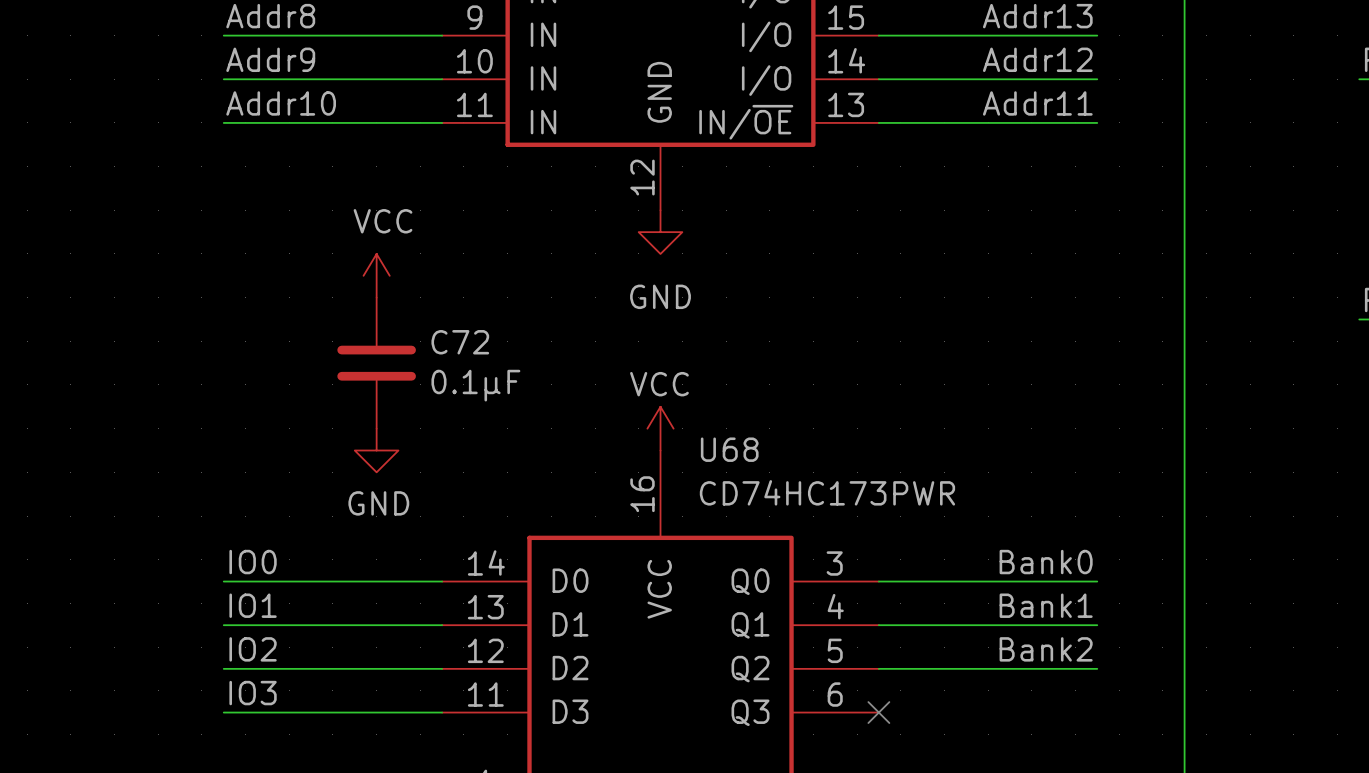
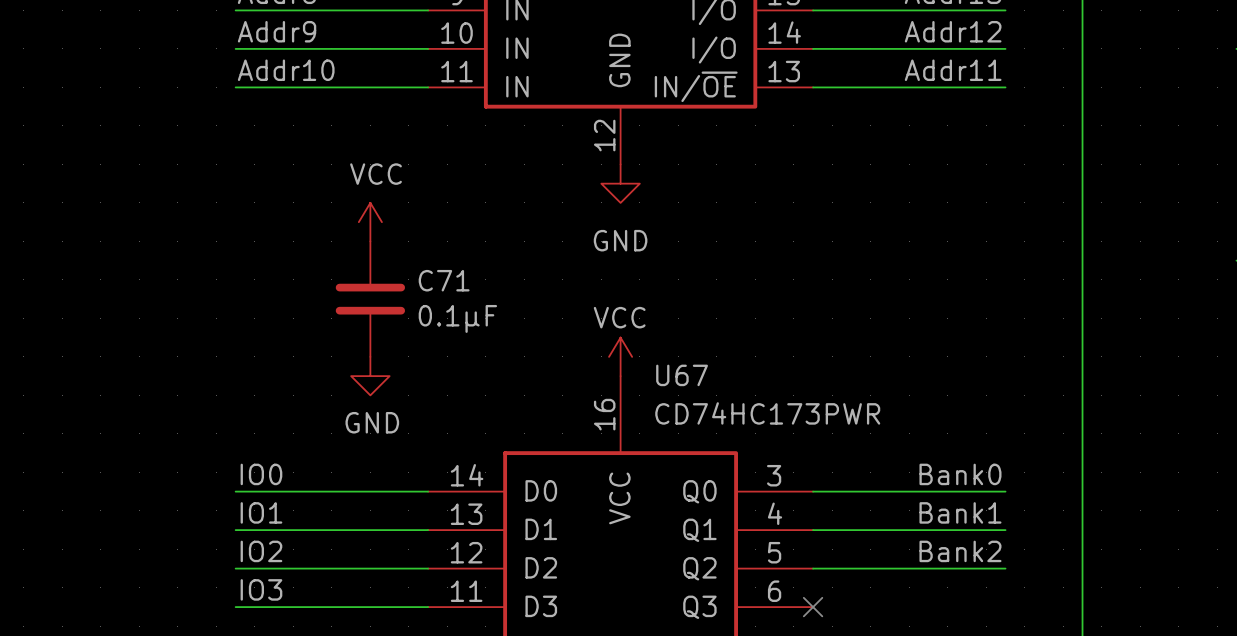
C72 name: C72 (460, 342) -> C71 (444, 280)
U68 name: U68 (729, 449) -> U67 (682, 375)

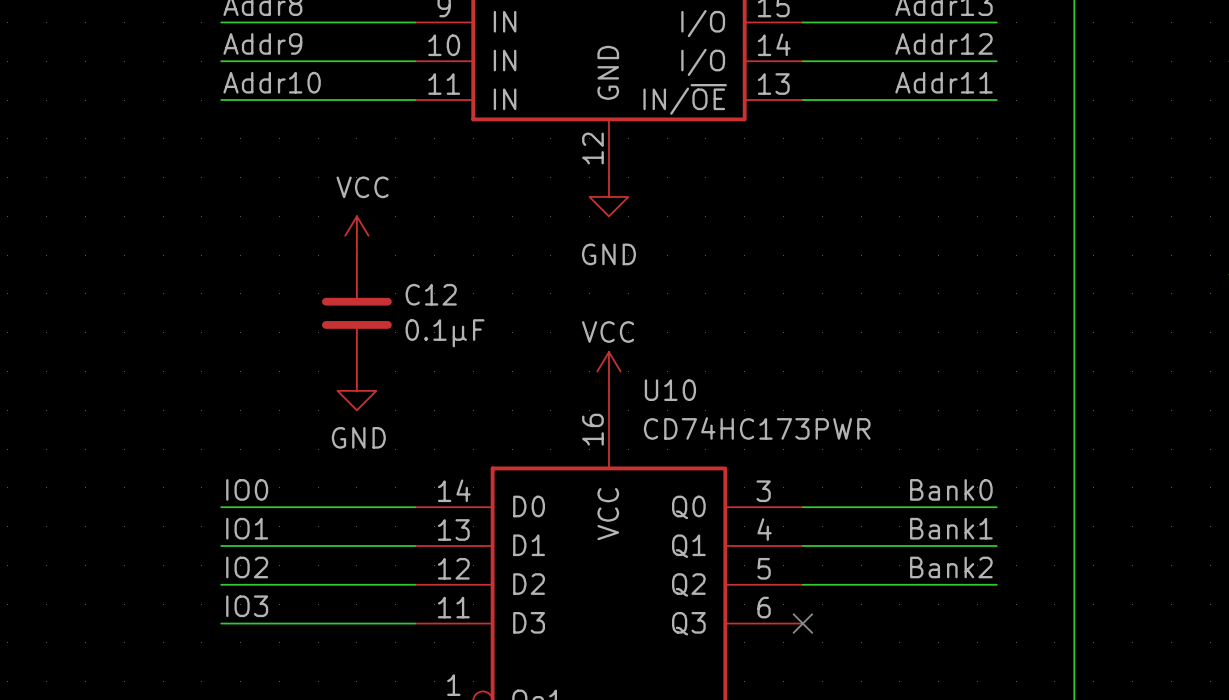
C71 name: C71 (444, 280) -> C12 (431, 294)
U67 name: U67 (682, 375) -> U10 (670, 390)

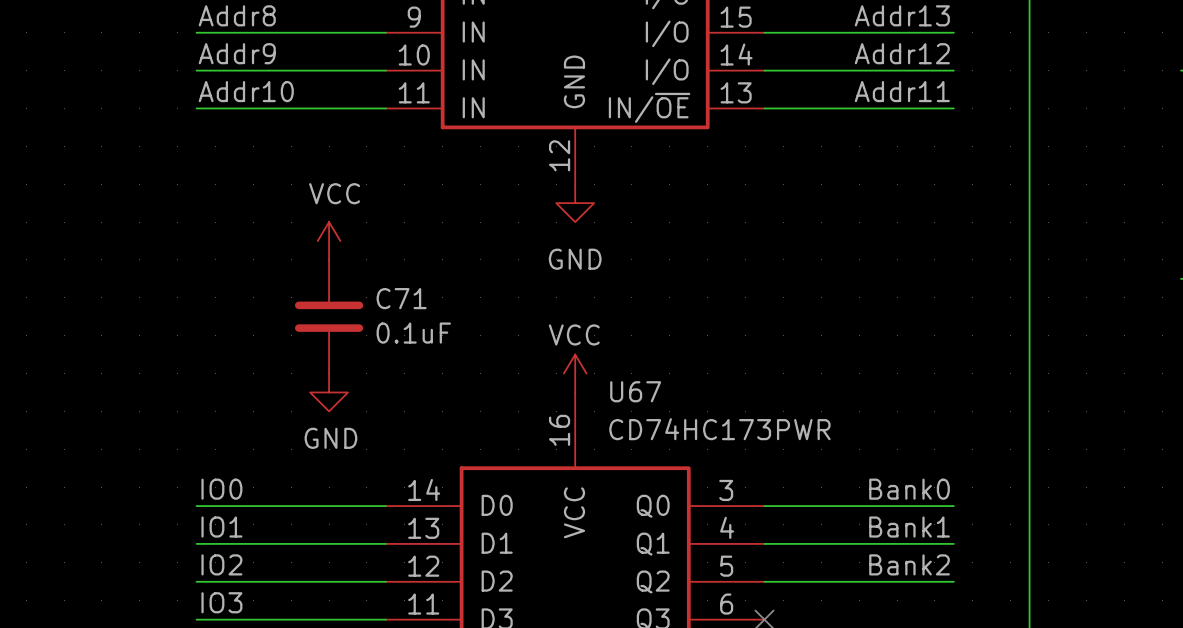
C12 name: C12 (431, 294) -> C71 (401, 298)
C12 value: 0.1μF (445, 333) -> 0.1uF (413, 333)
U10 name: U10 (670, 390) -> U67 (635, 391)

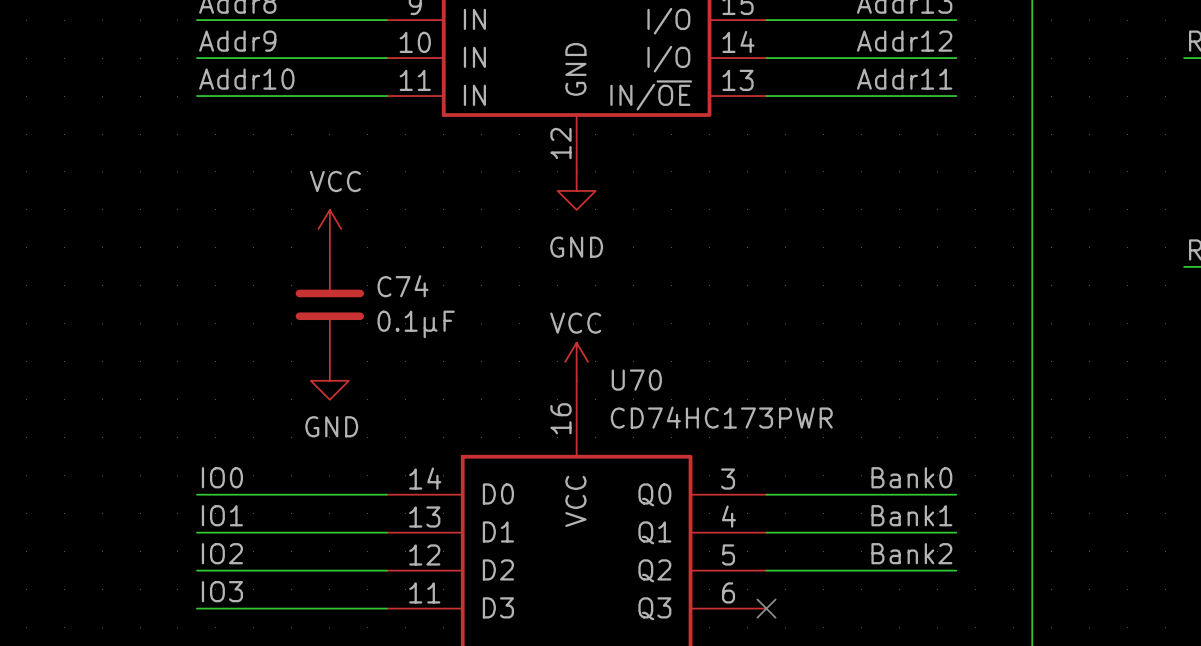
C71 name: C71 (401, 298) -> C74 (403, 286)
C71 value: 0.1uF (413, 333) -> 0.1μF (416, 324)
U67 name: U67 (635, 391) -> U70 (636, 380)

